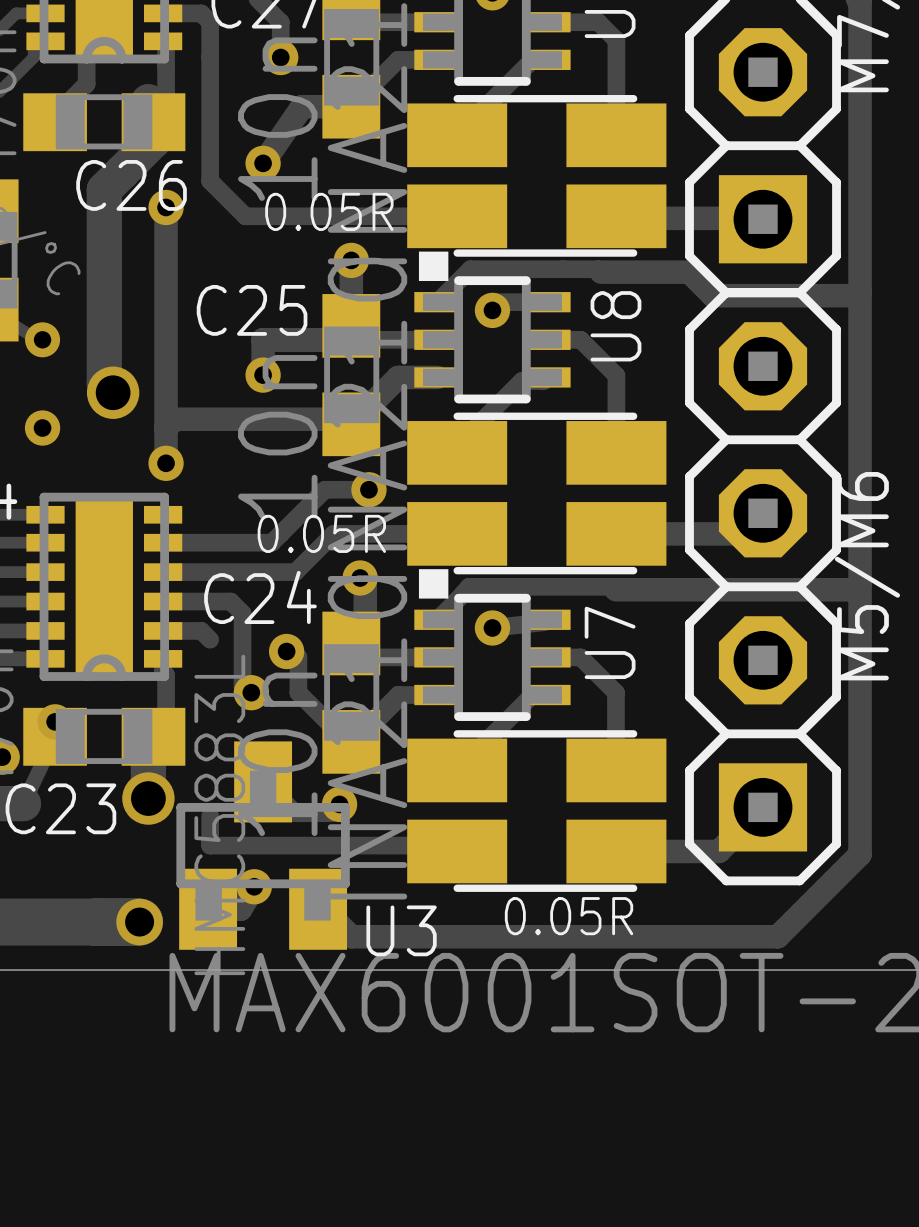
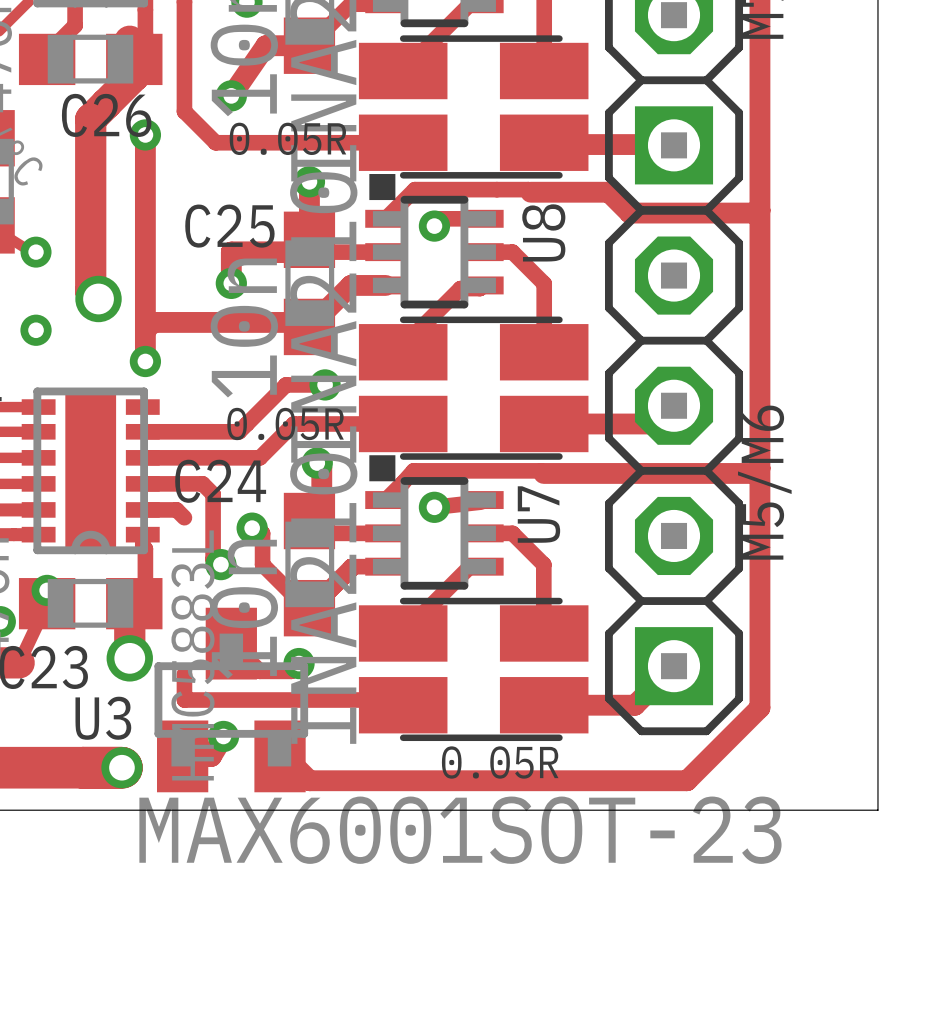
U3 name position: U3 (401, 930) -> U3 (103, 718)

